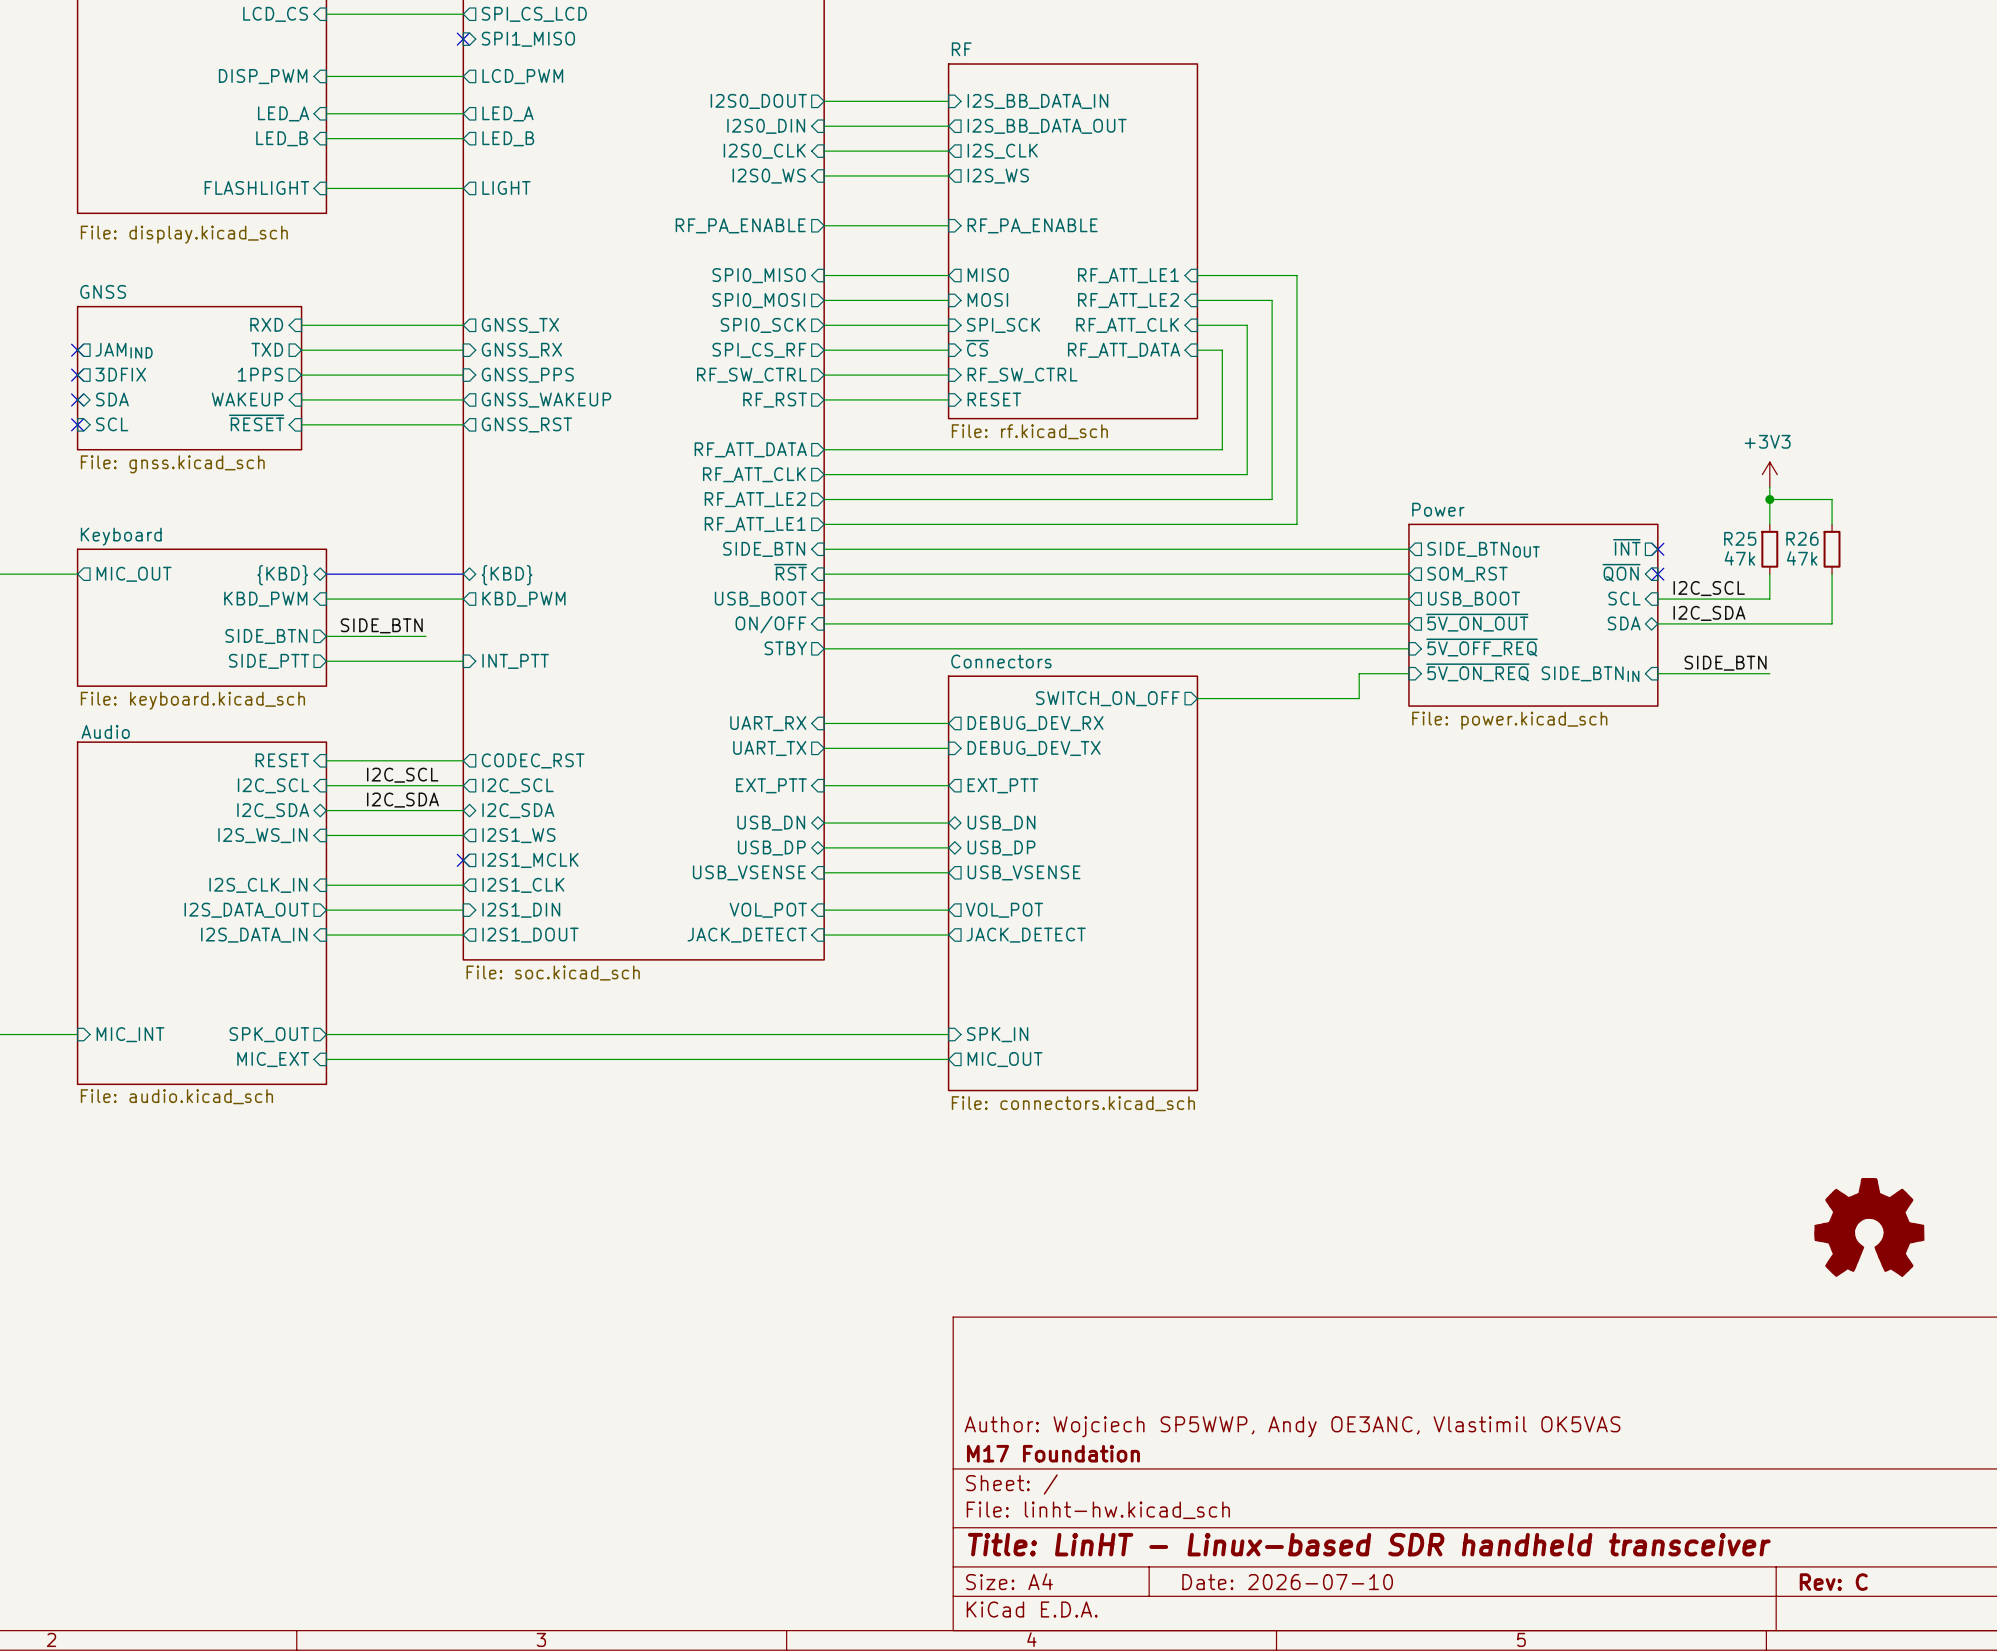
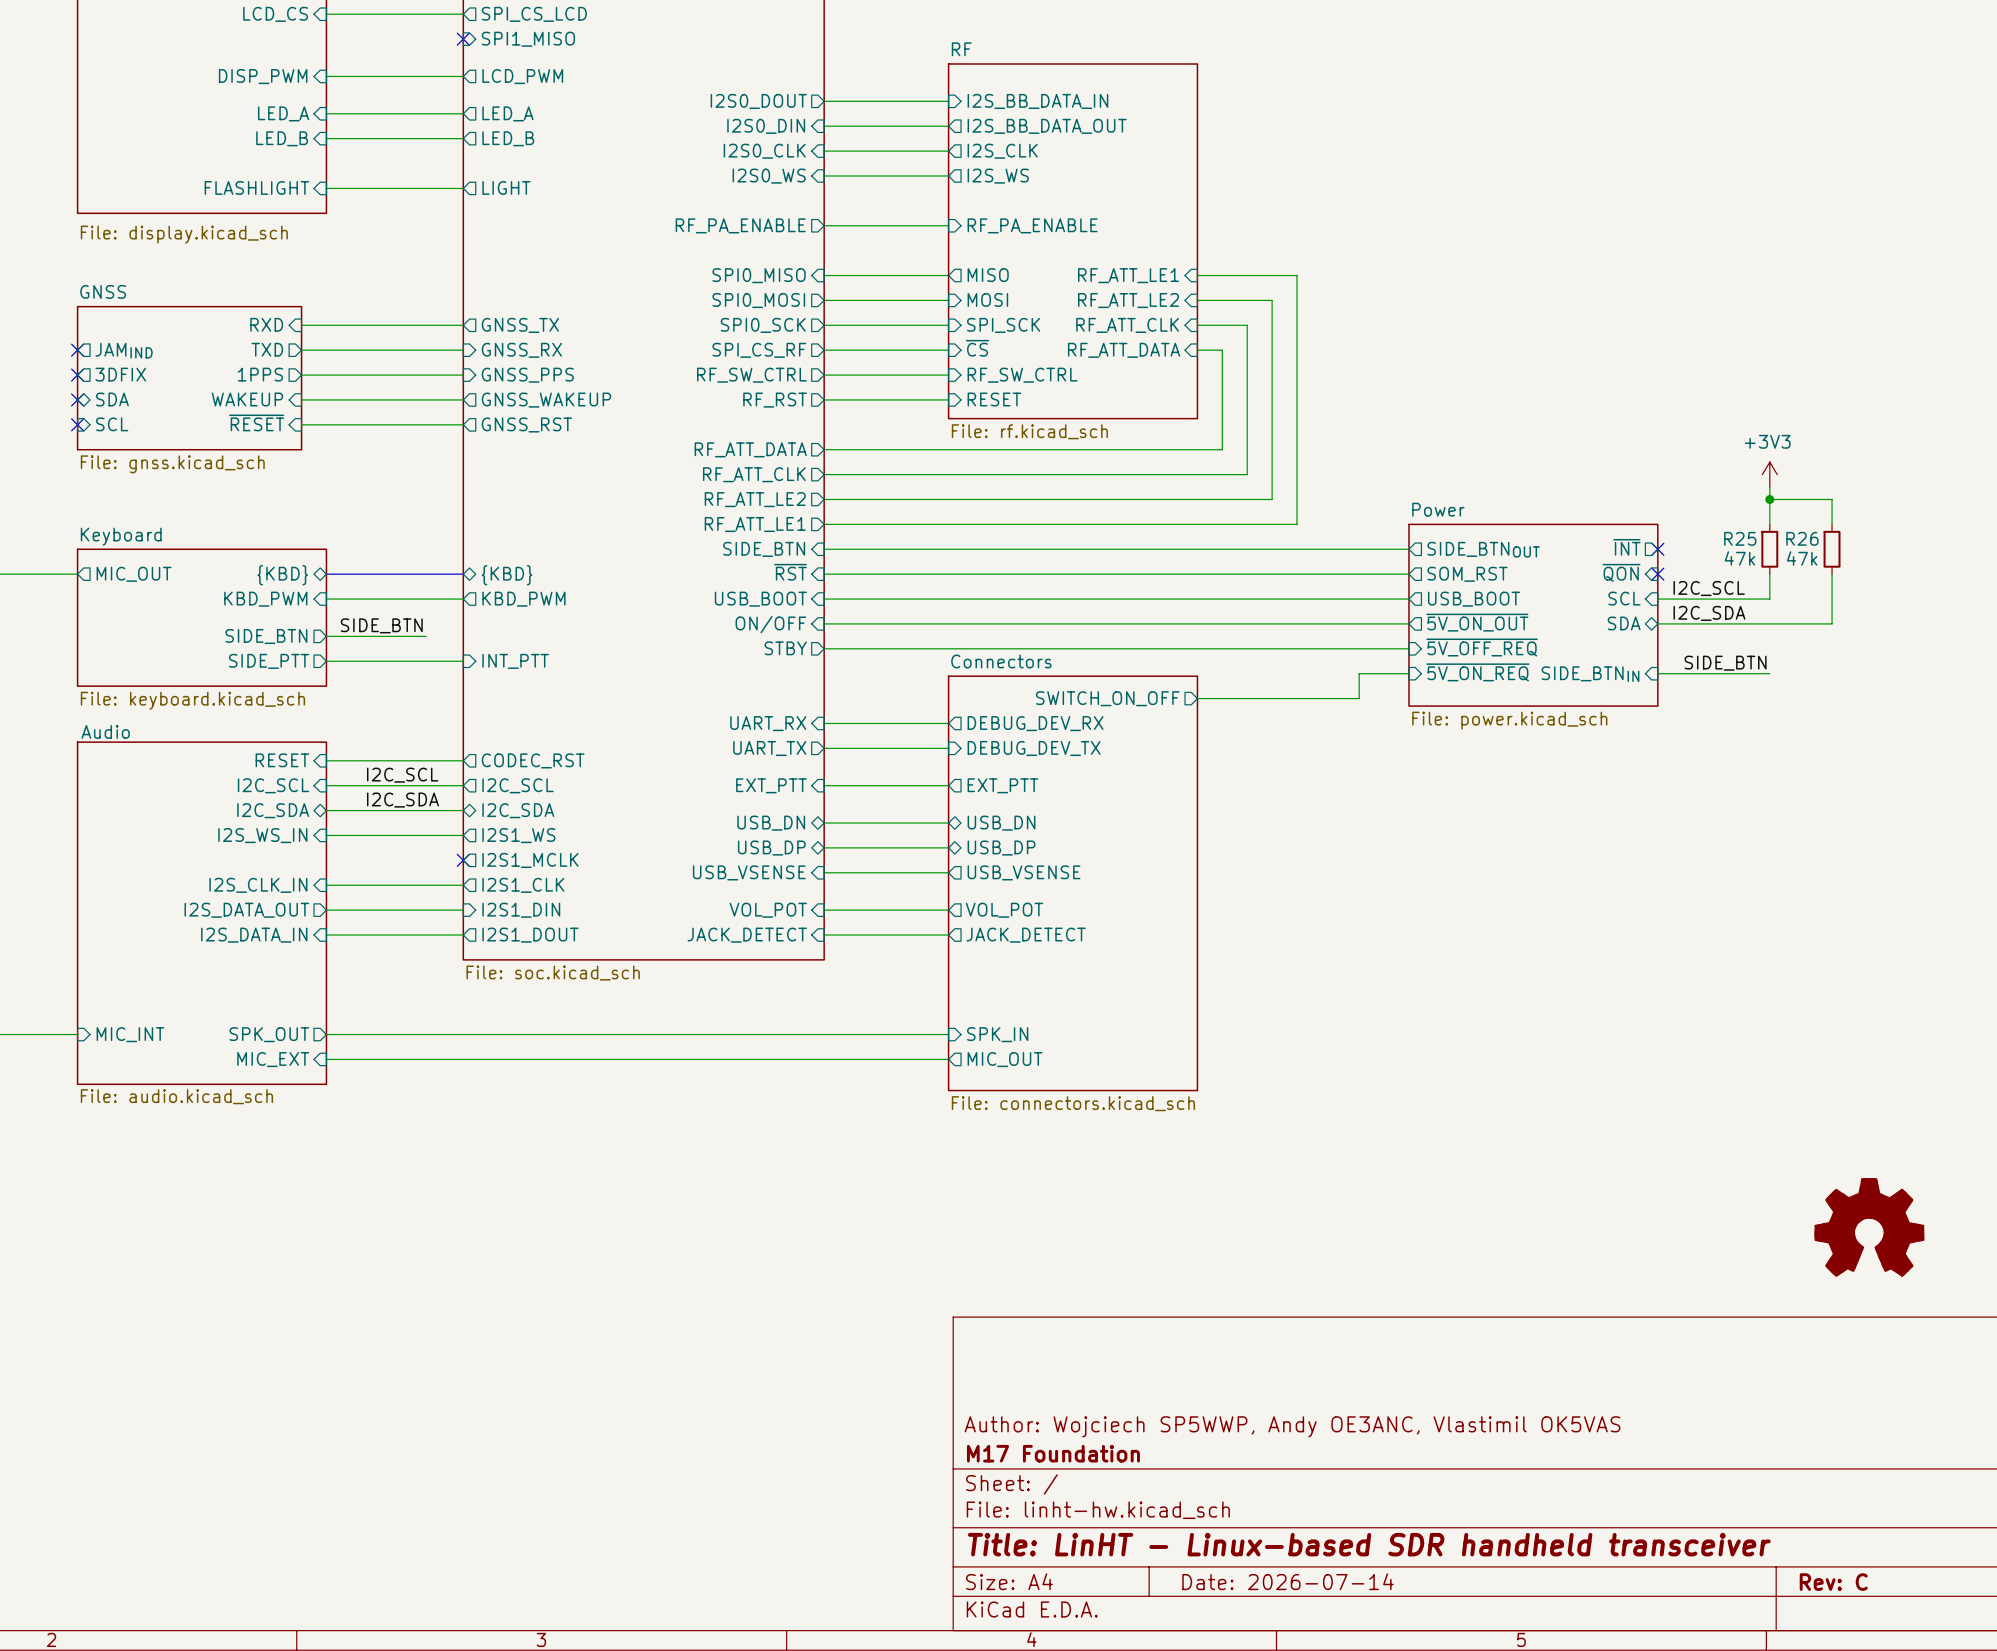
title block: Date: 2026-07-10 (1287, 1582) -> Date: 2026-07-14 (1287, 1581)

